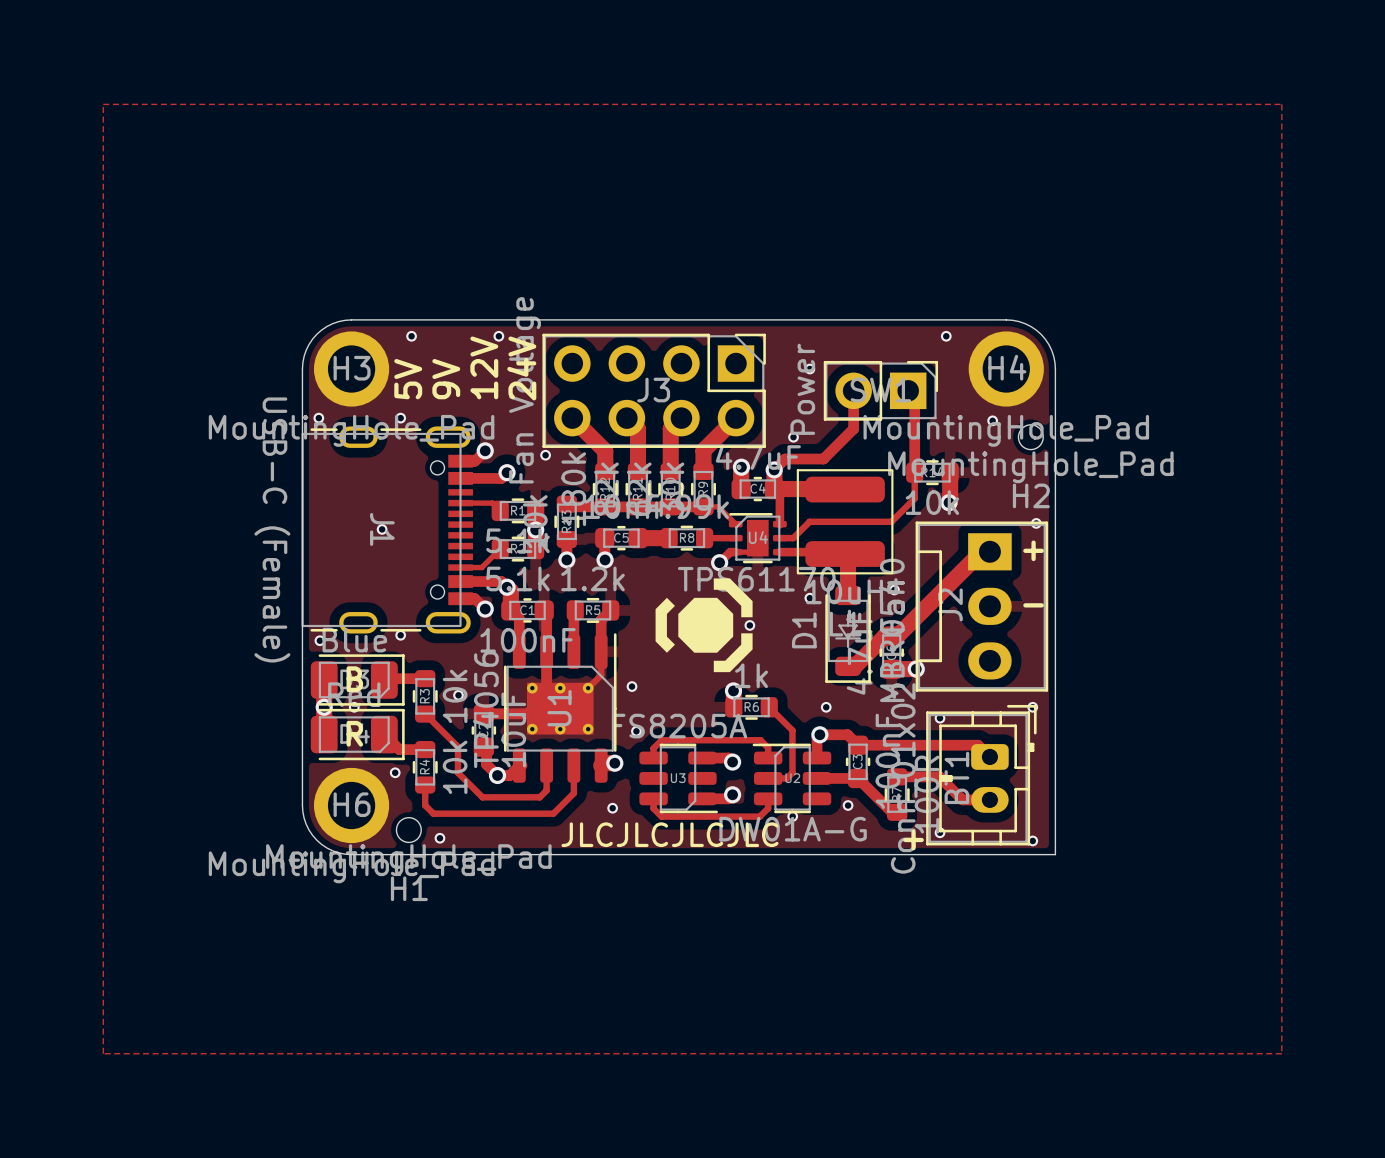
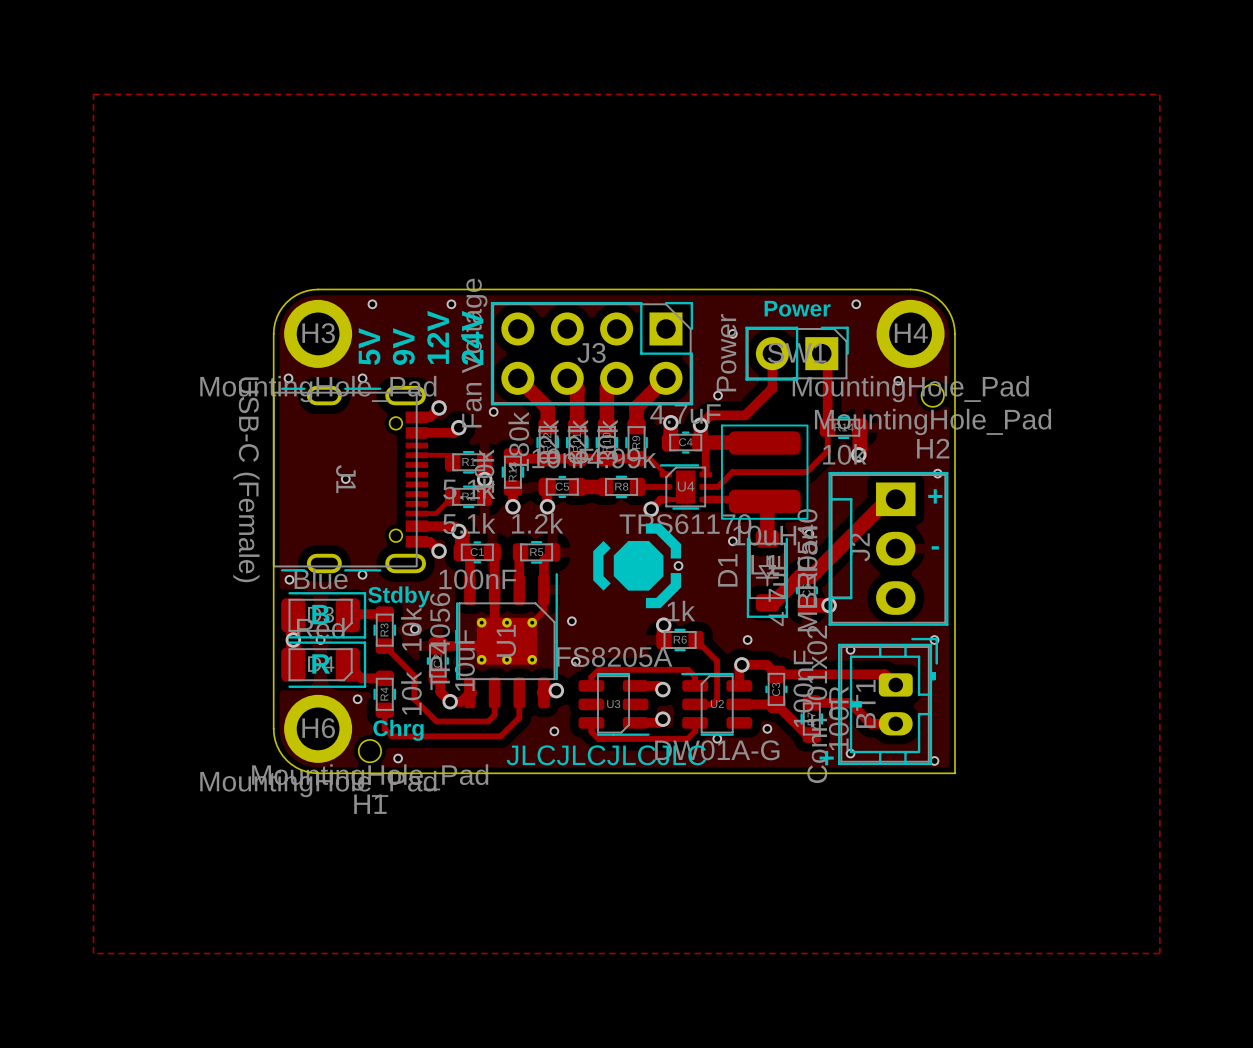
text: none -> Power (797, 308)
text: none -> Stdby (399, 596)
text: none -> Chrg (398, 730)

